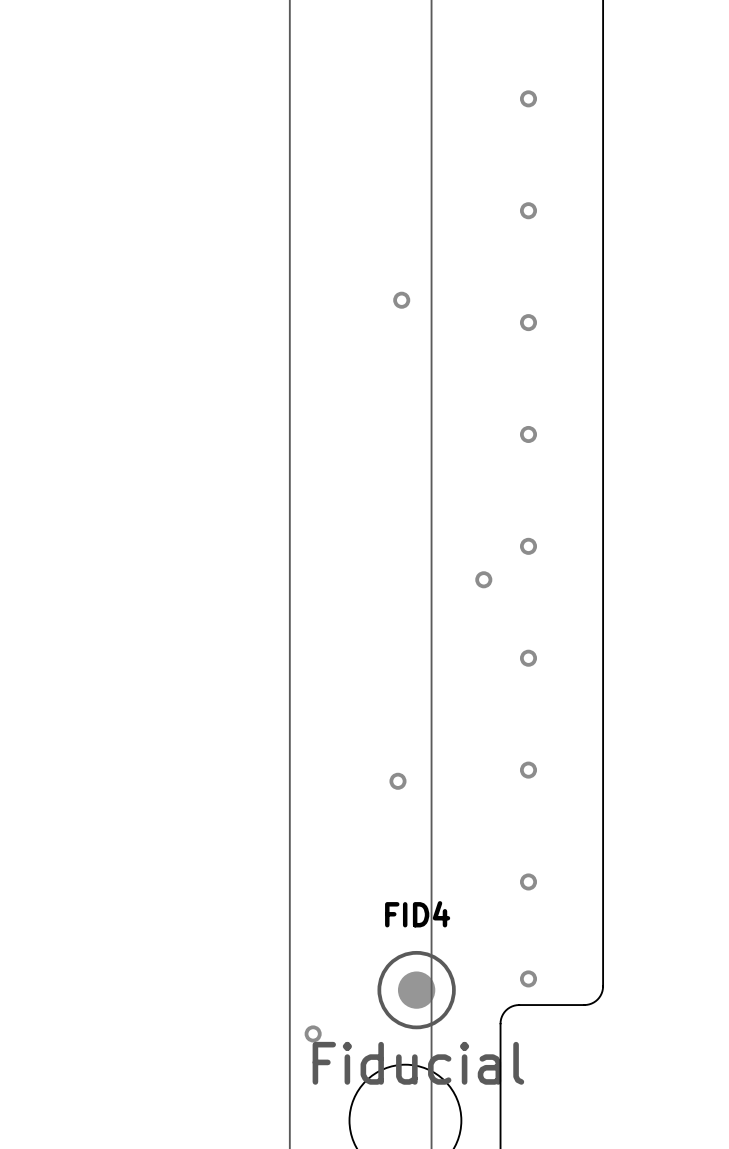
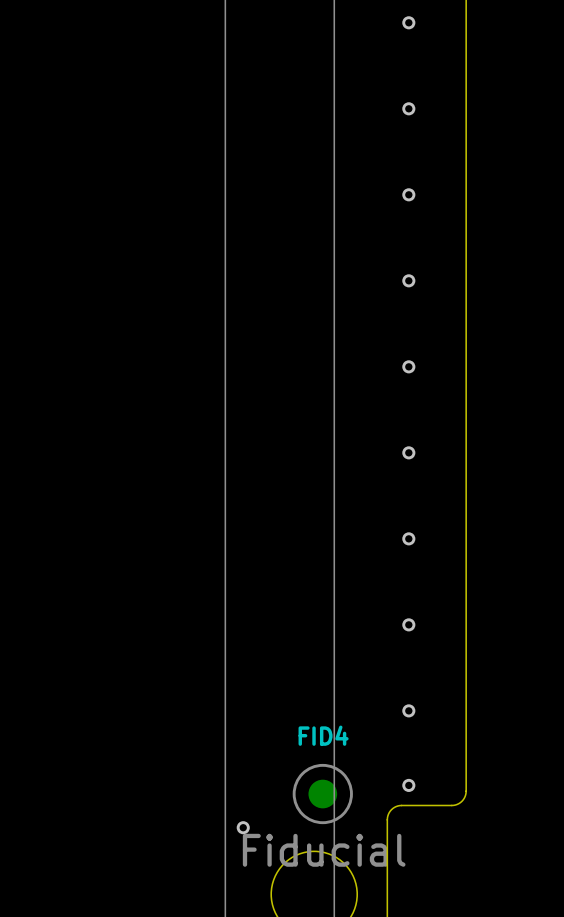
via: (401, 300) -> none
via: (483, 579) -> none
via: (397, 781) -> none

